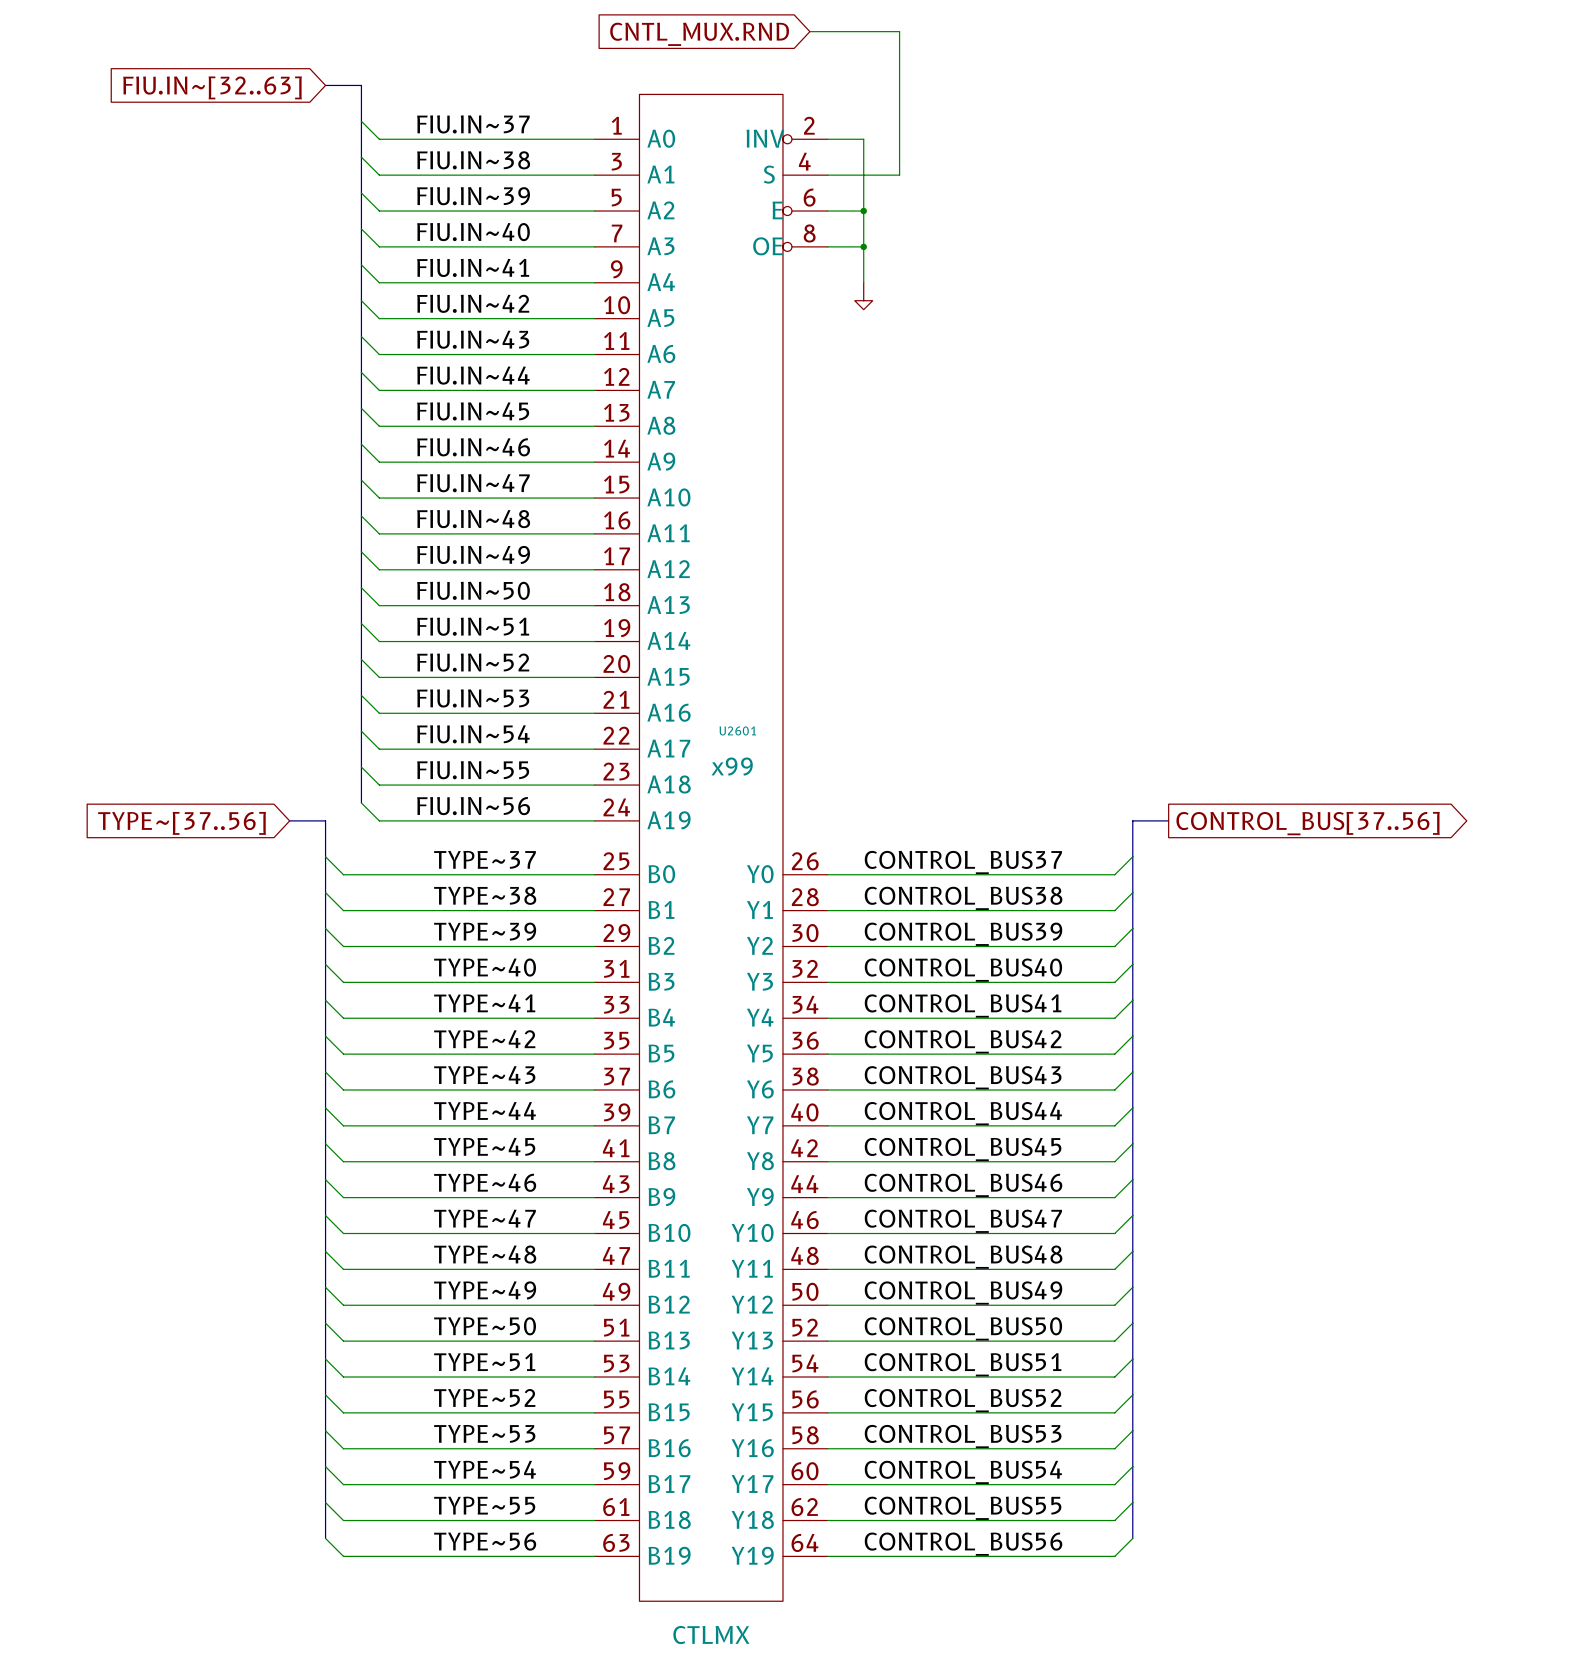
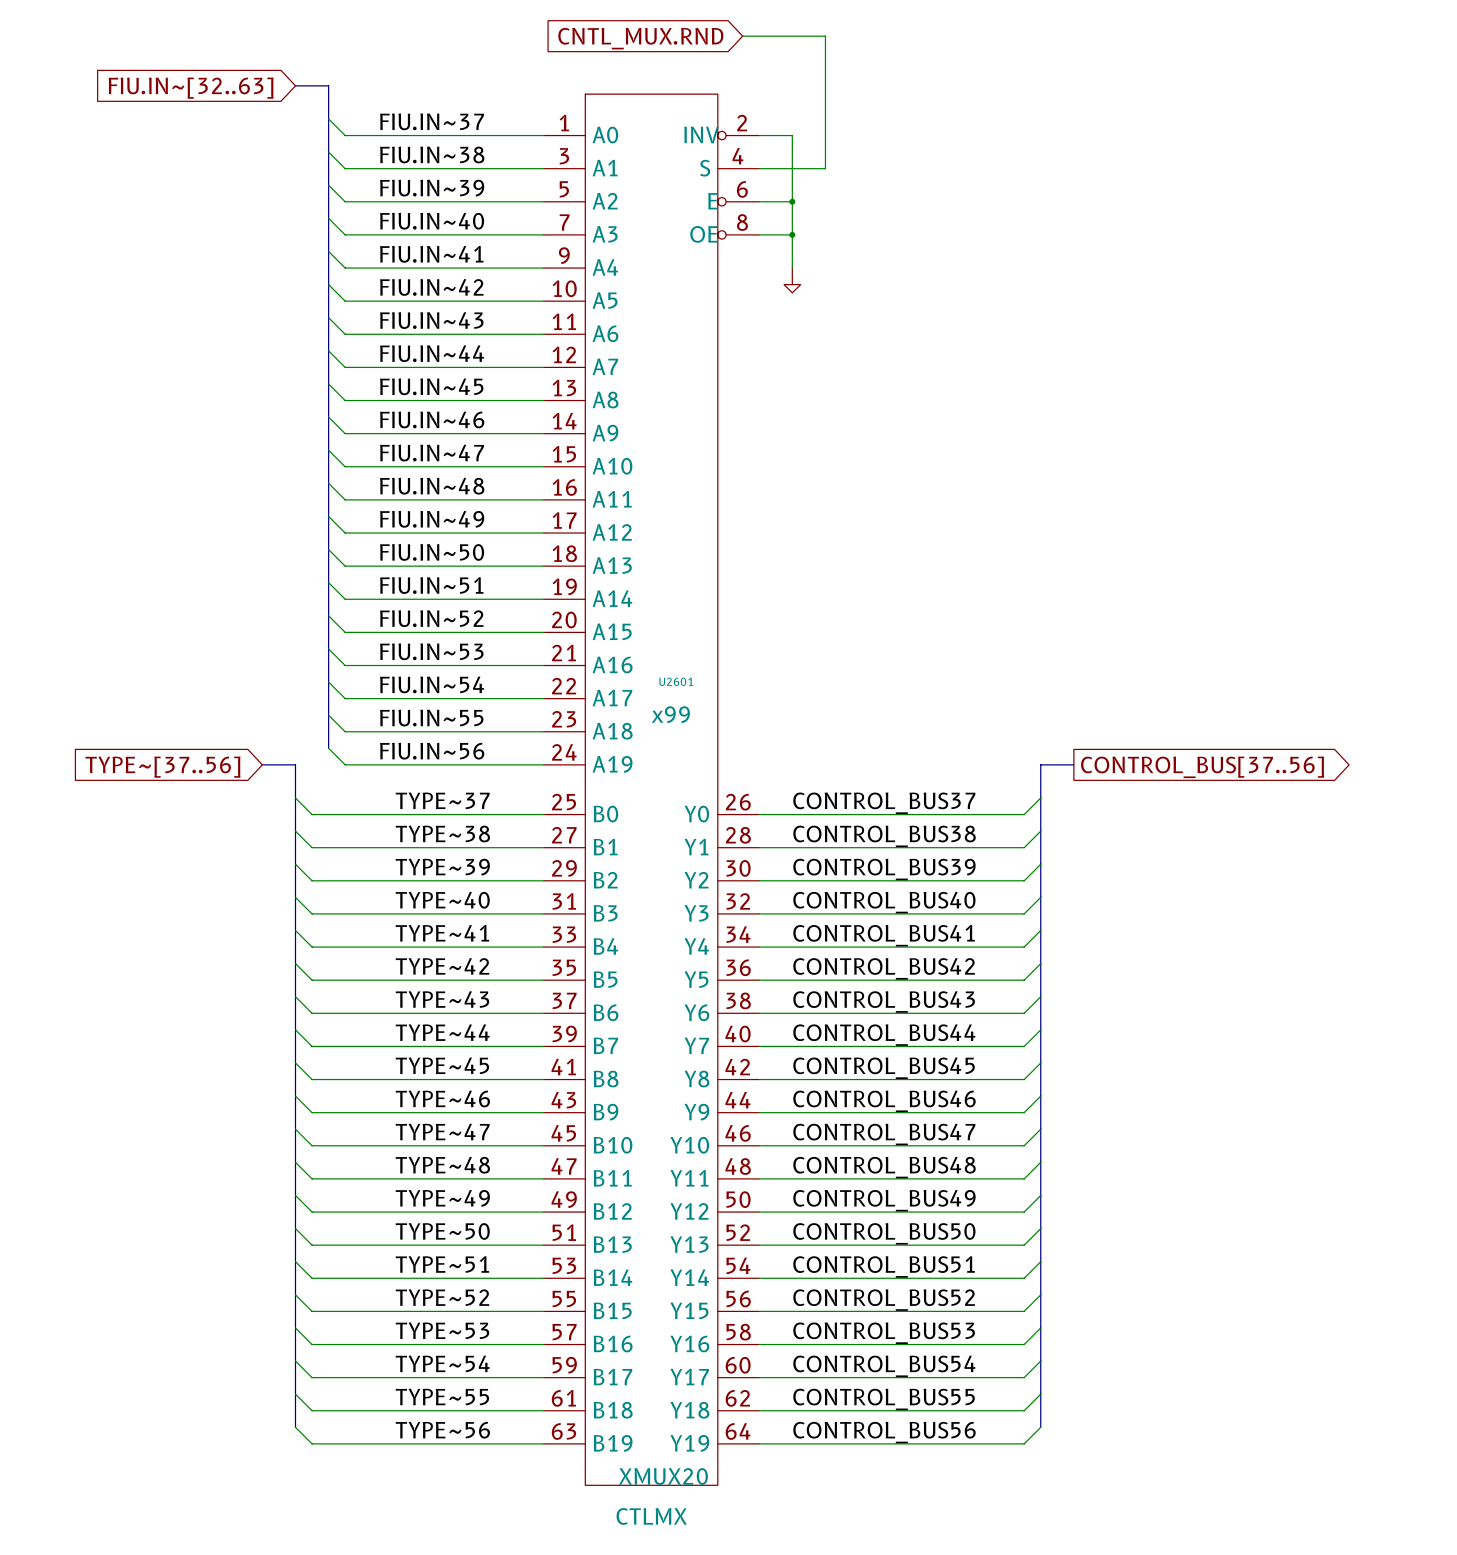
U2601 value: none -> XMUX20 (663, 1476)

